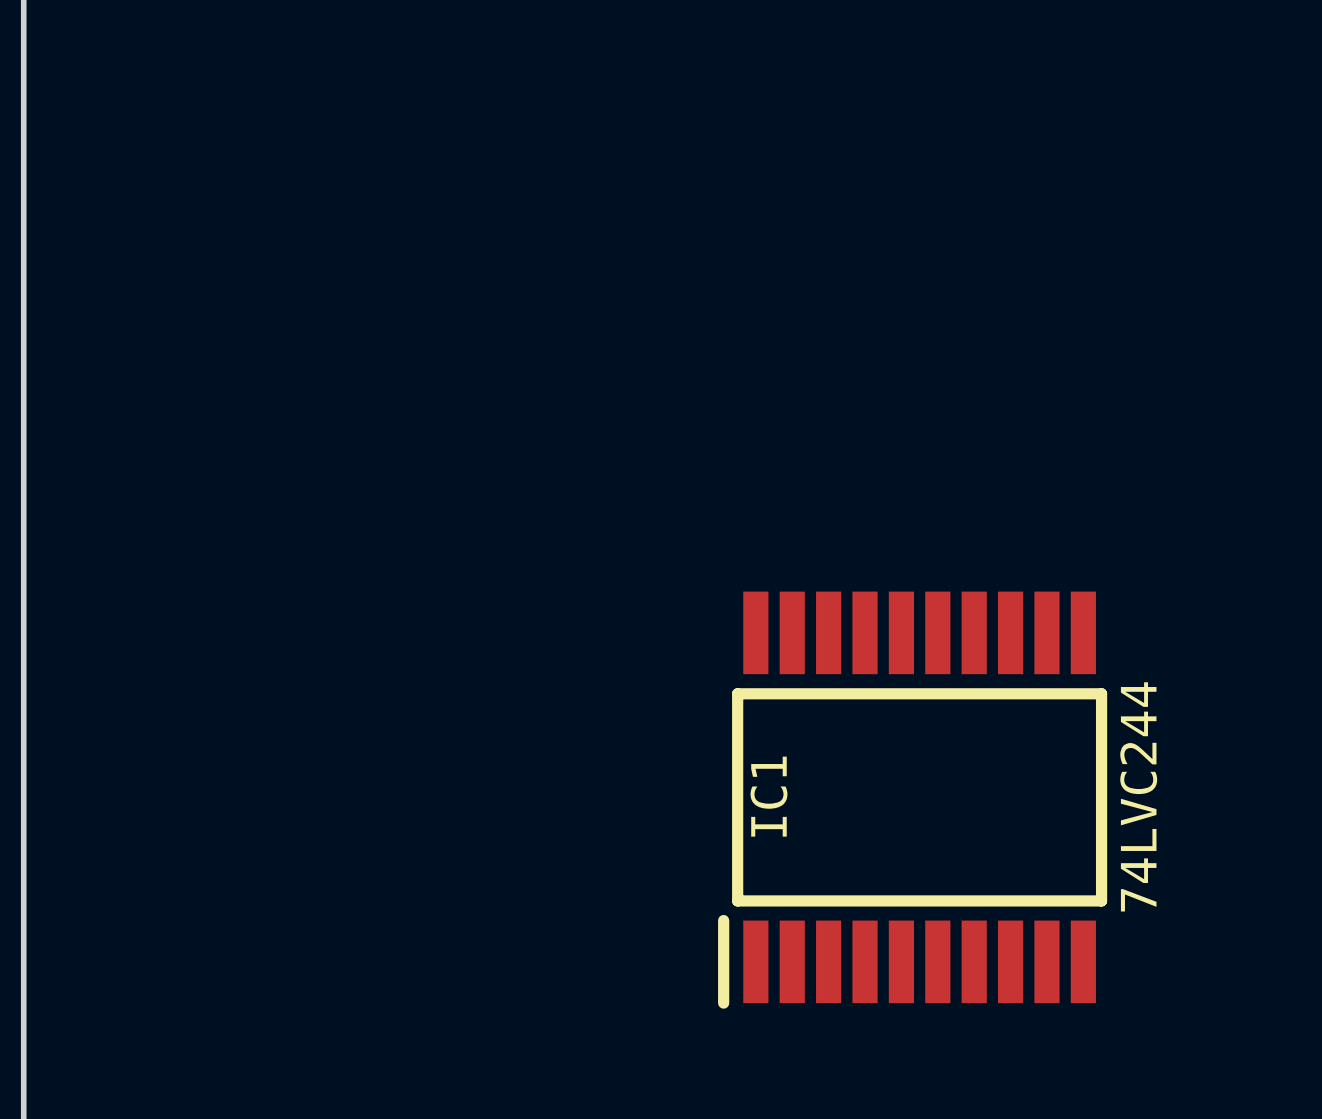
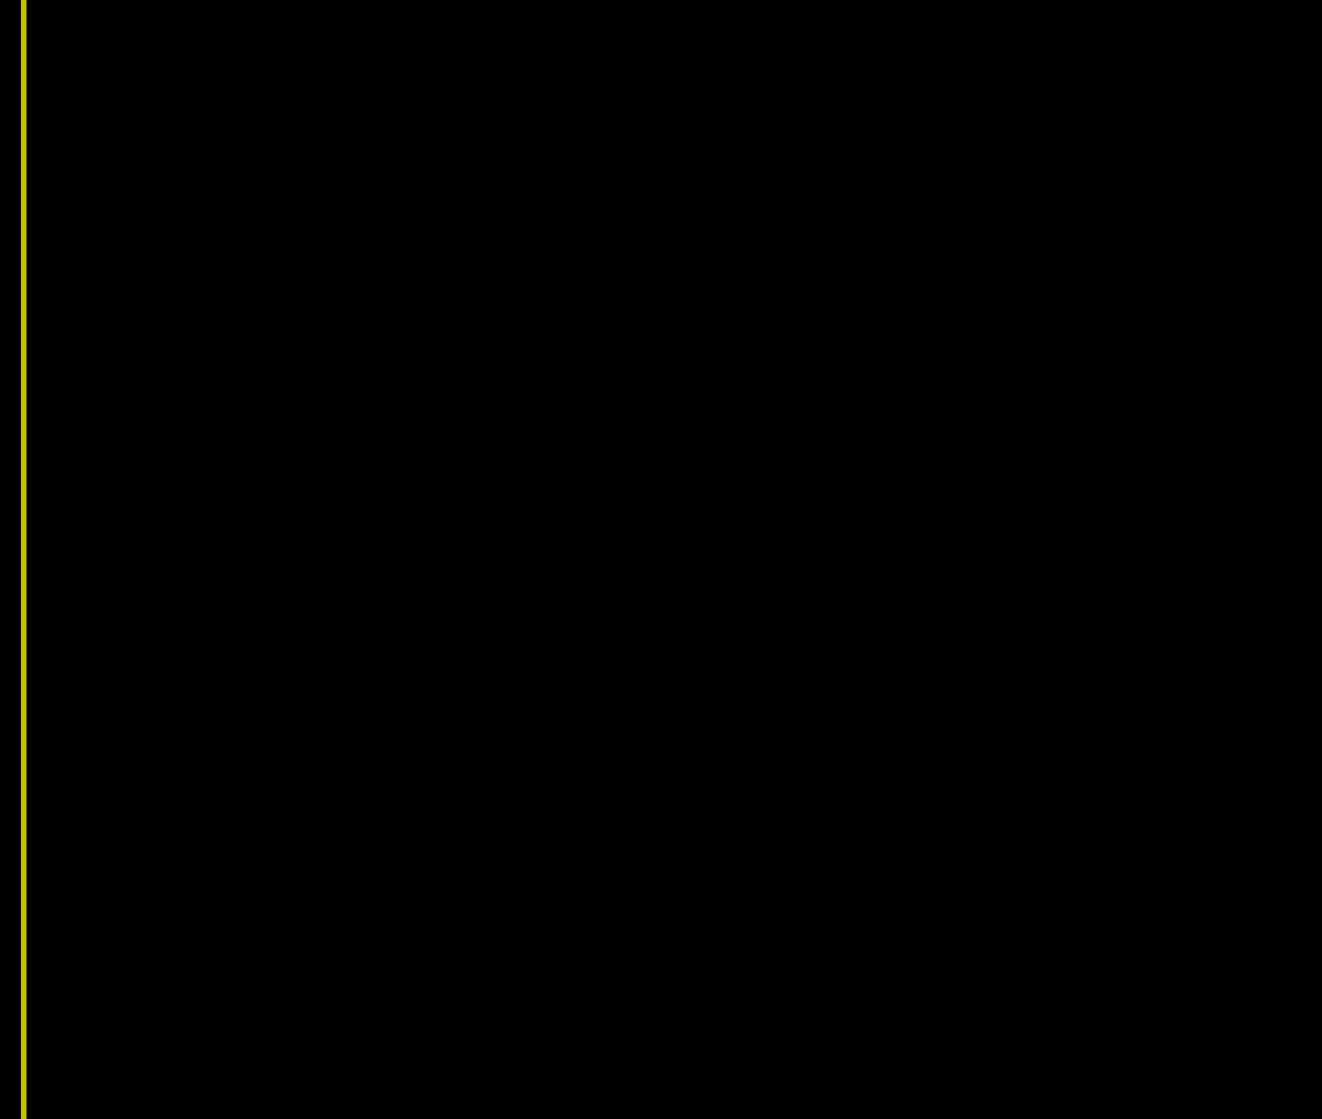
IC1: (912, 800) -> none

